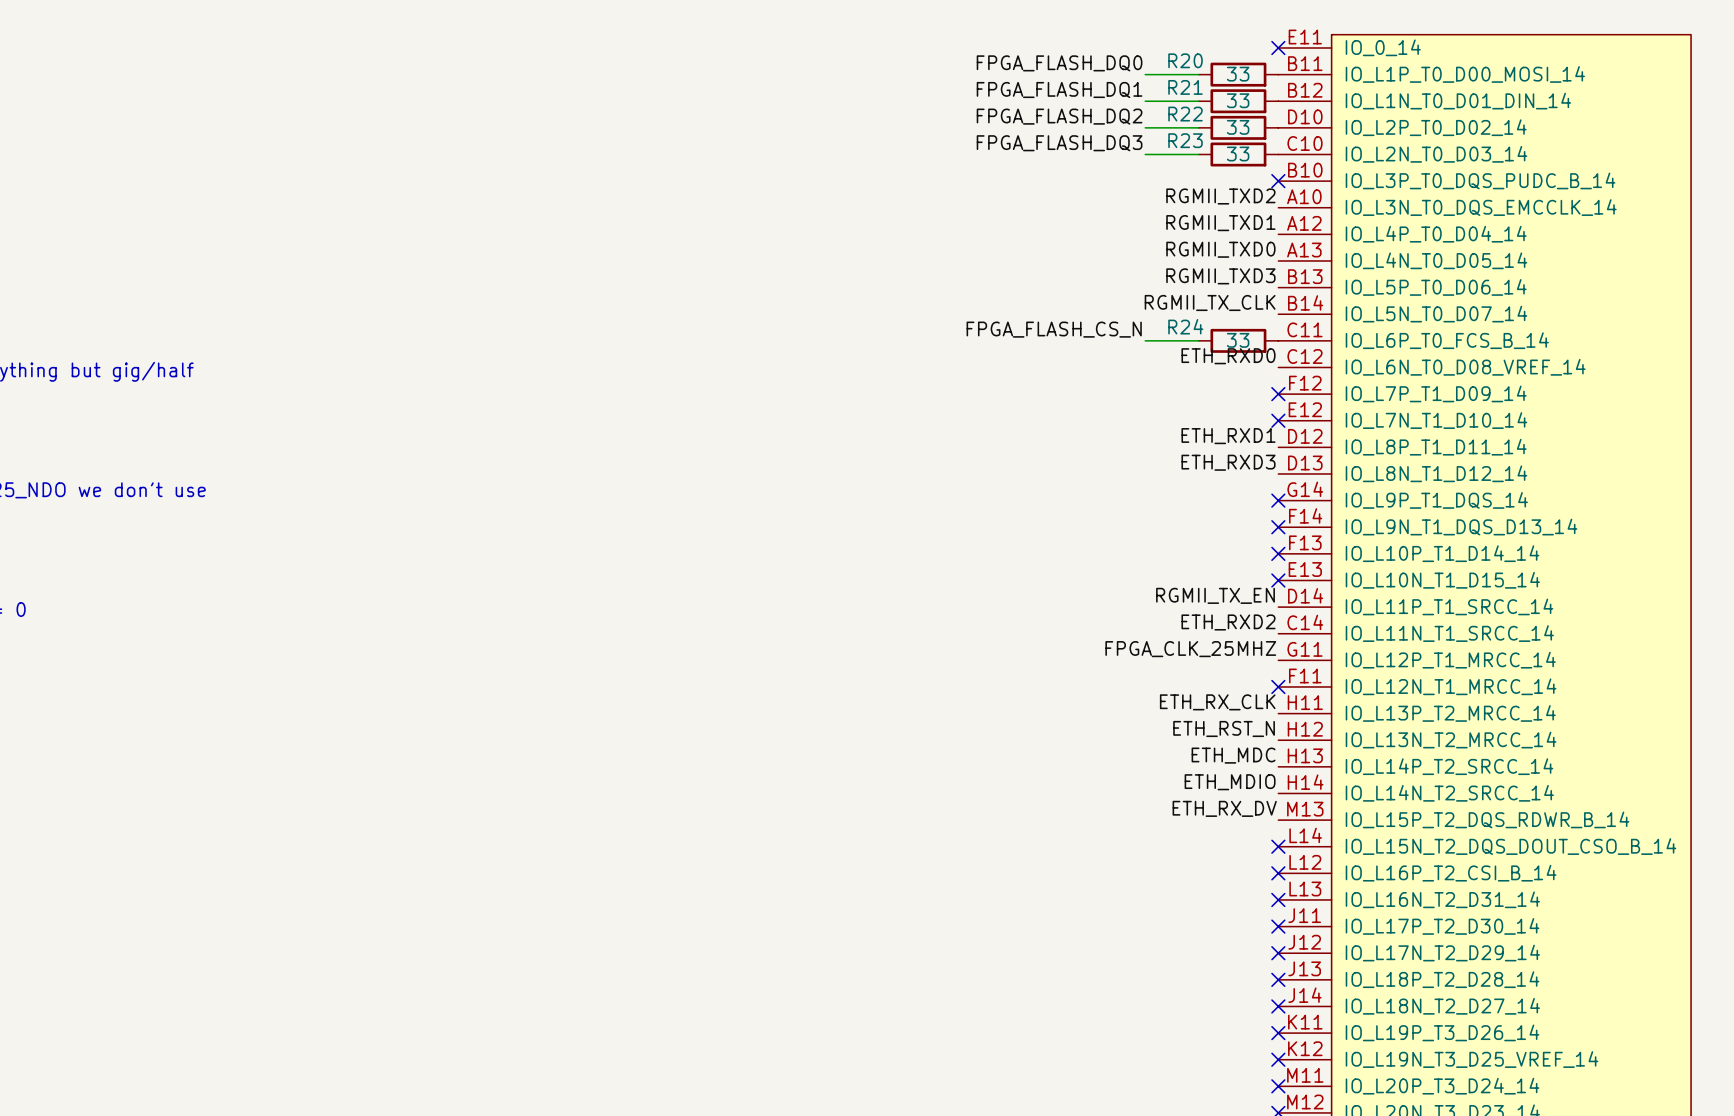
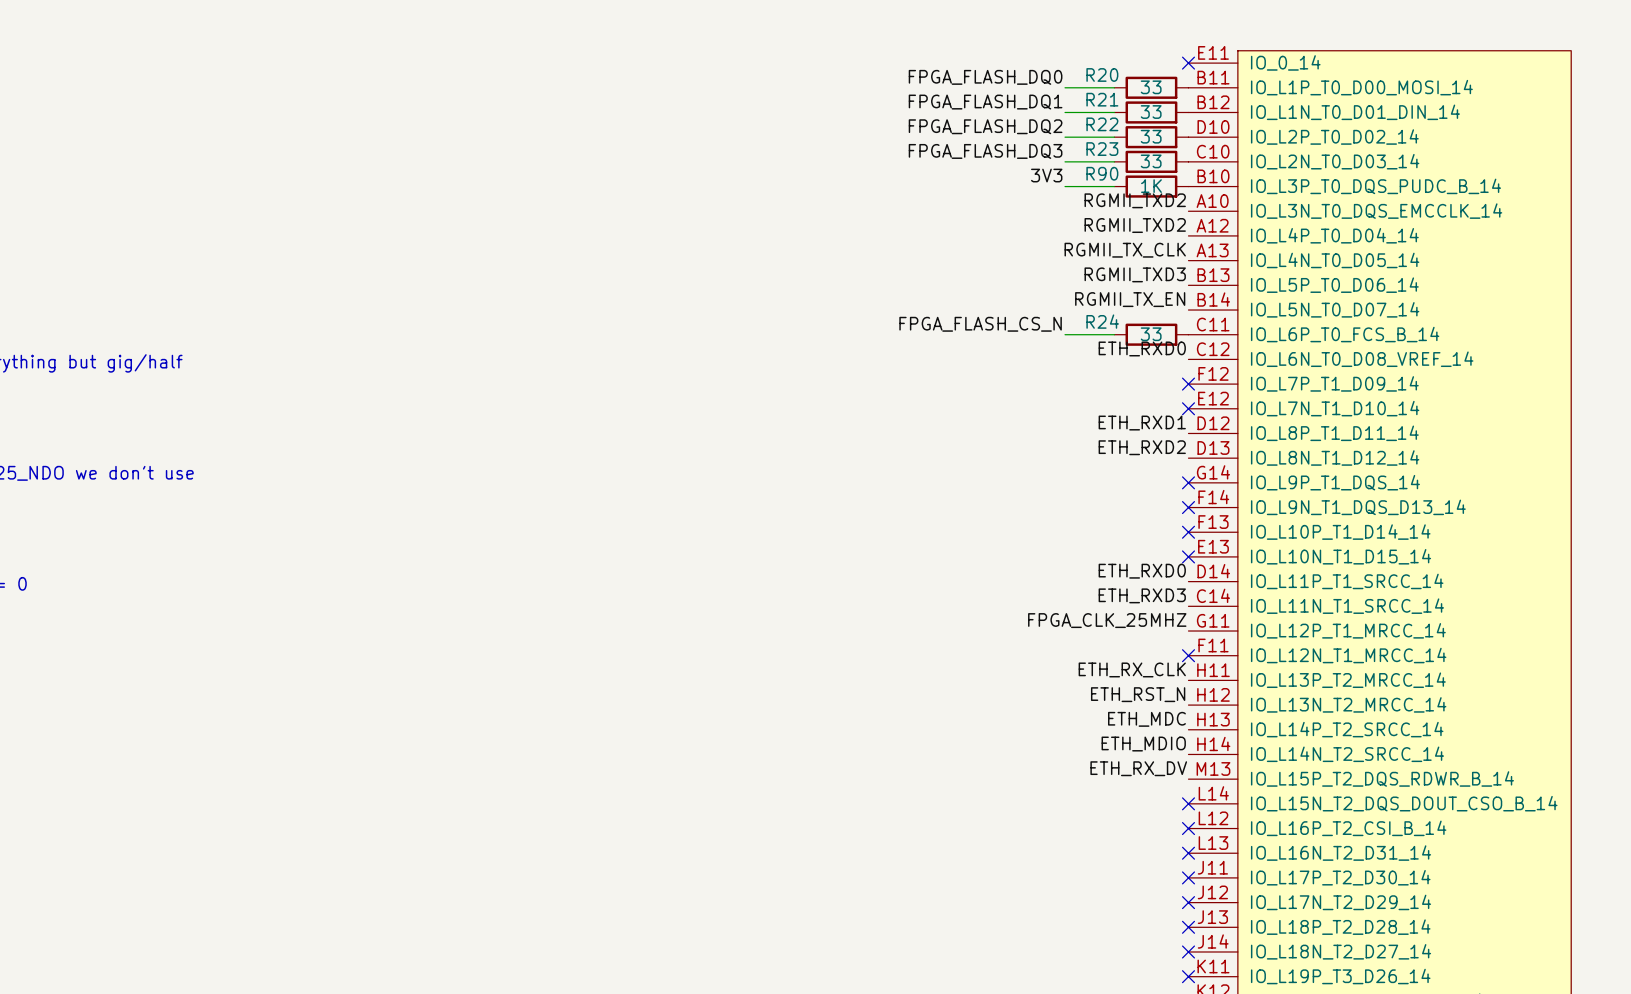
label: none -> 3V3 (1046, 175)
wire: none -> (1065, 186) (1114, 186)
R90: none -> 1K (1151, 186)
no-connect mark: (1278, 181) -> none
label: RGMII_TXD1 (1220, 223) -> RGMII_TXD2 (1135, 225)
label: RGMII_TXD0 (1220, 249) -> RGMII_TX_CLK (1125, 250)
label: RGMII_TX_CLK (1210, 302) -> RGMII_TX_EN (1130, 299)
label: ETH_RXD3 (1228, 462) -> ETH_RXD2 (1142, 447)
label: RGMII_TX_EN (1215, 595) -> ETH_RXD0 (1142, 571)
label: ETH_RXD2 (1228, 622) -> ETH_RXD3 (1142, 595)

